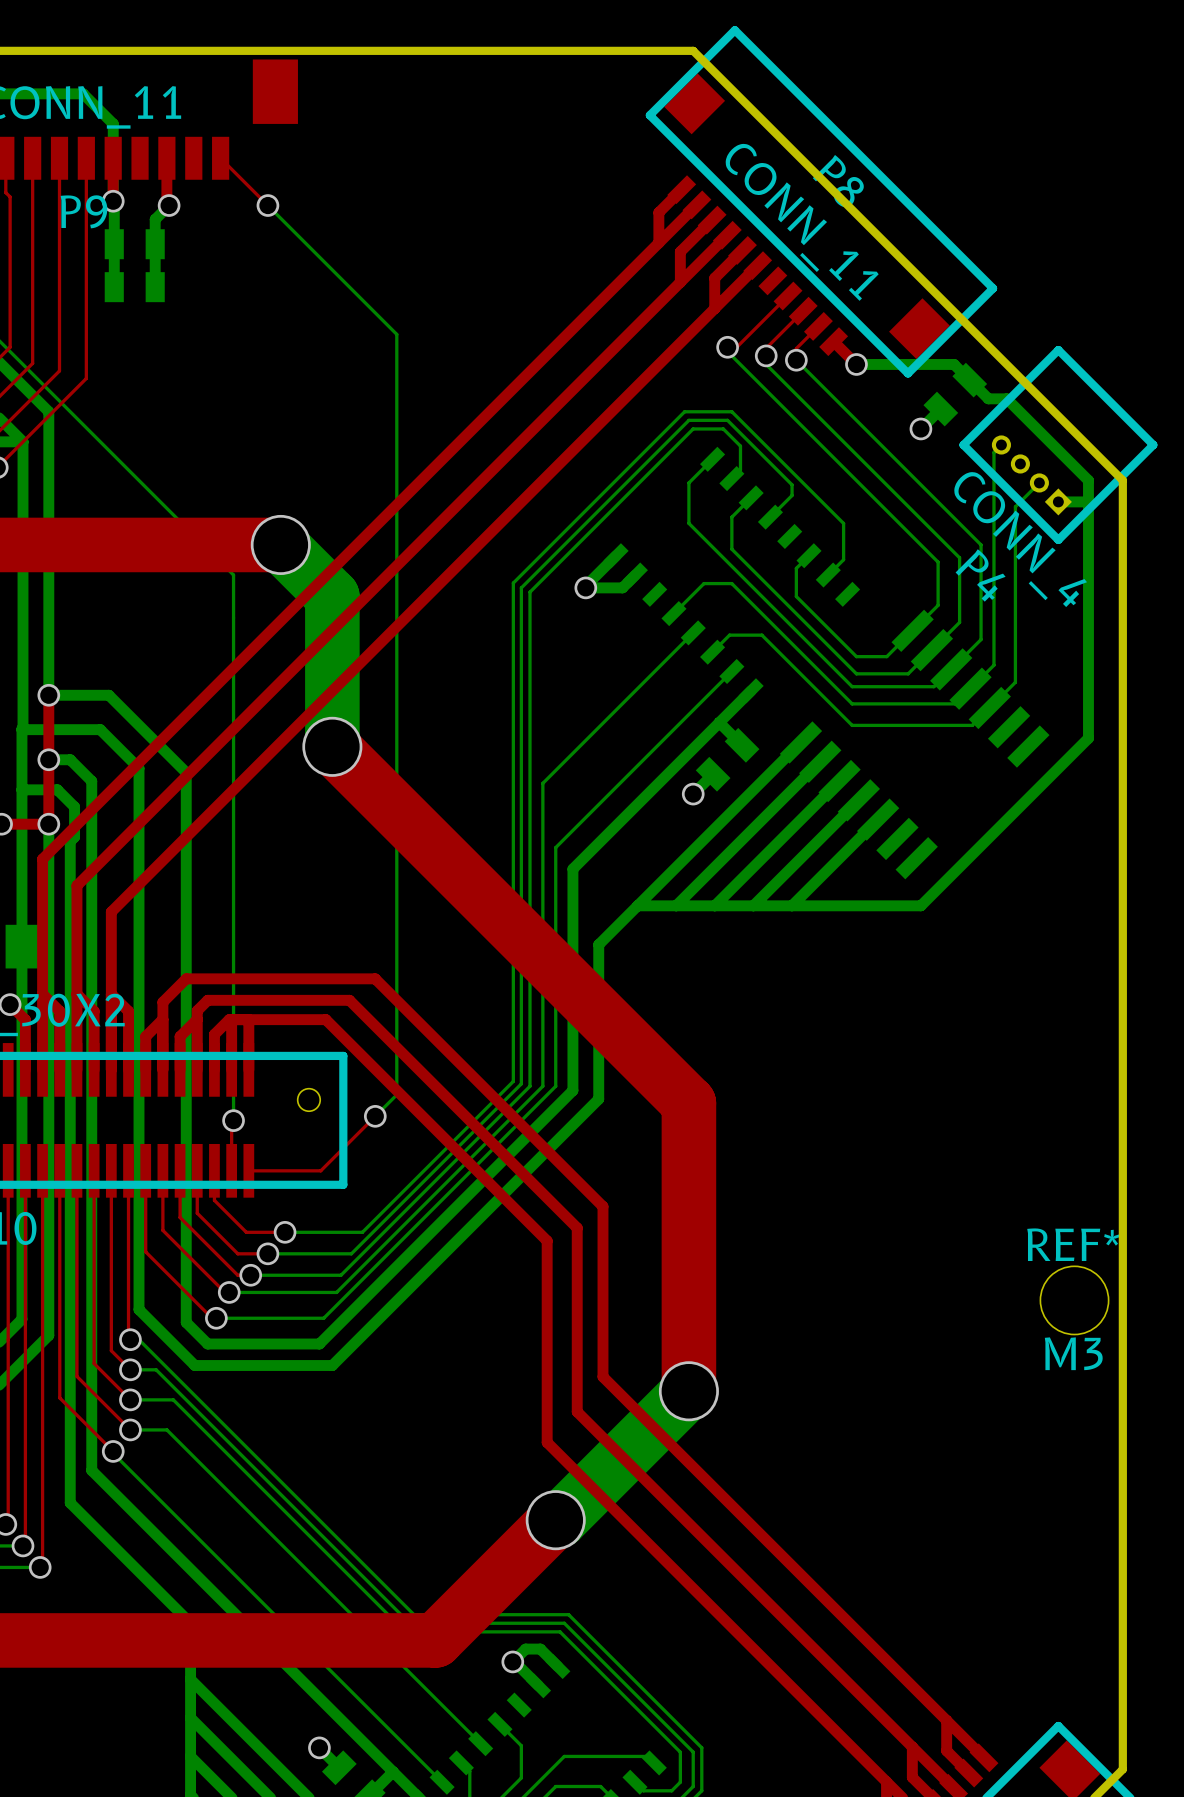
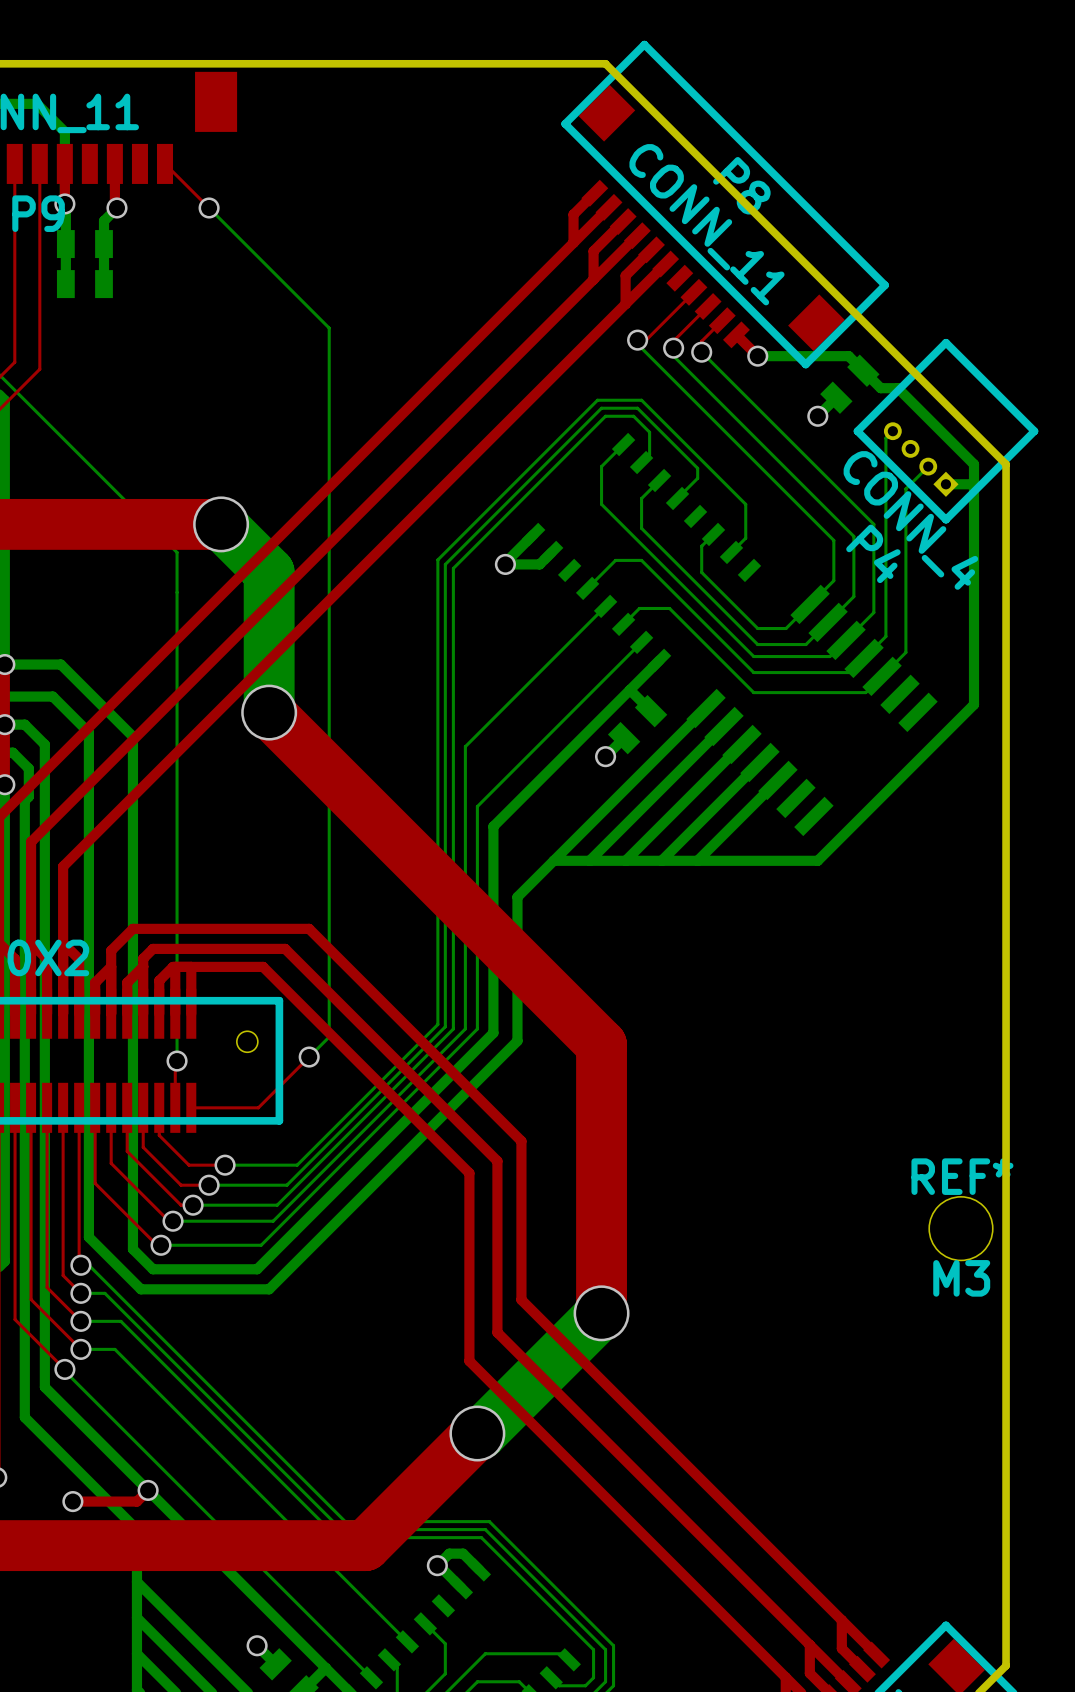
top track: none -> (148, 1490) (136, 1501) (72, 1501)
via: none -> (148, 1490)
via: none -> (72, 1501)

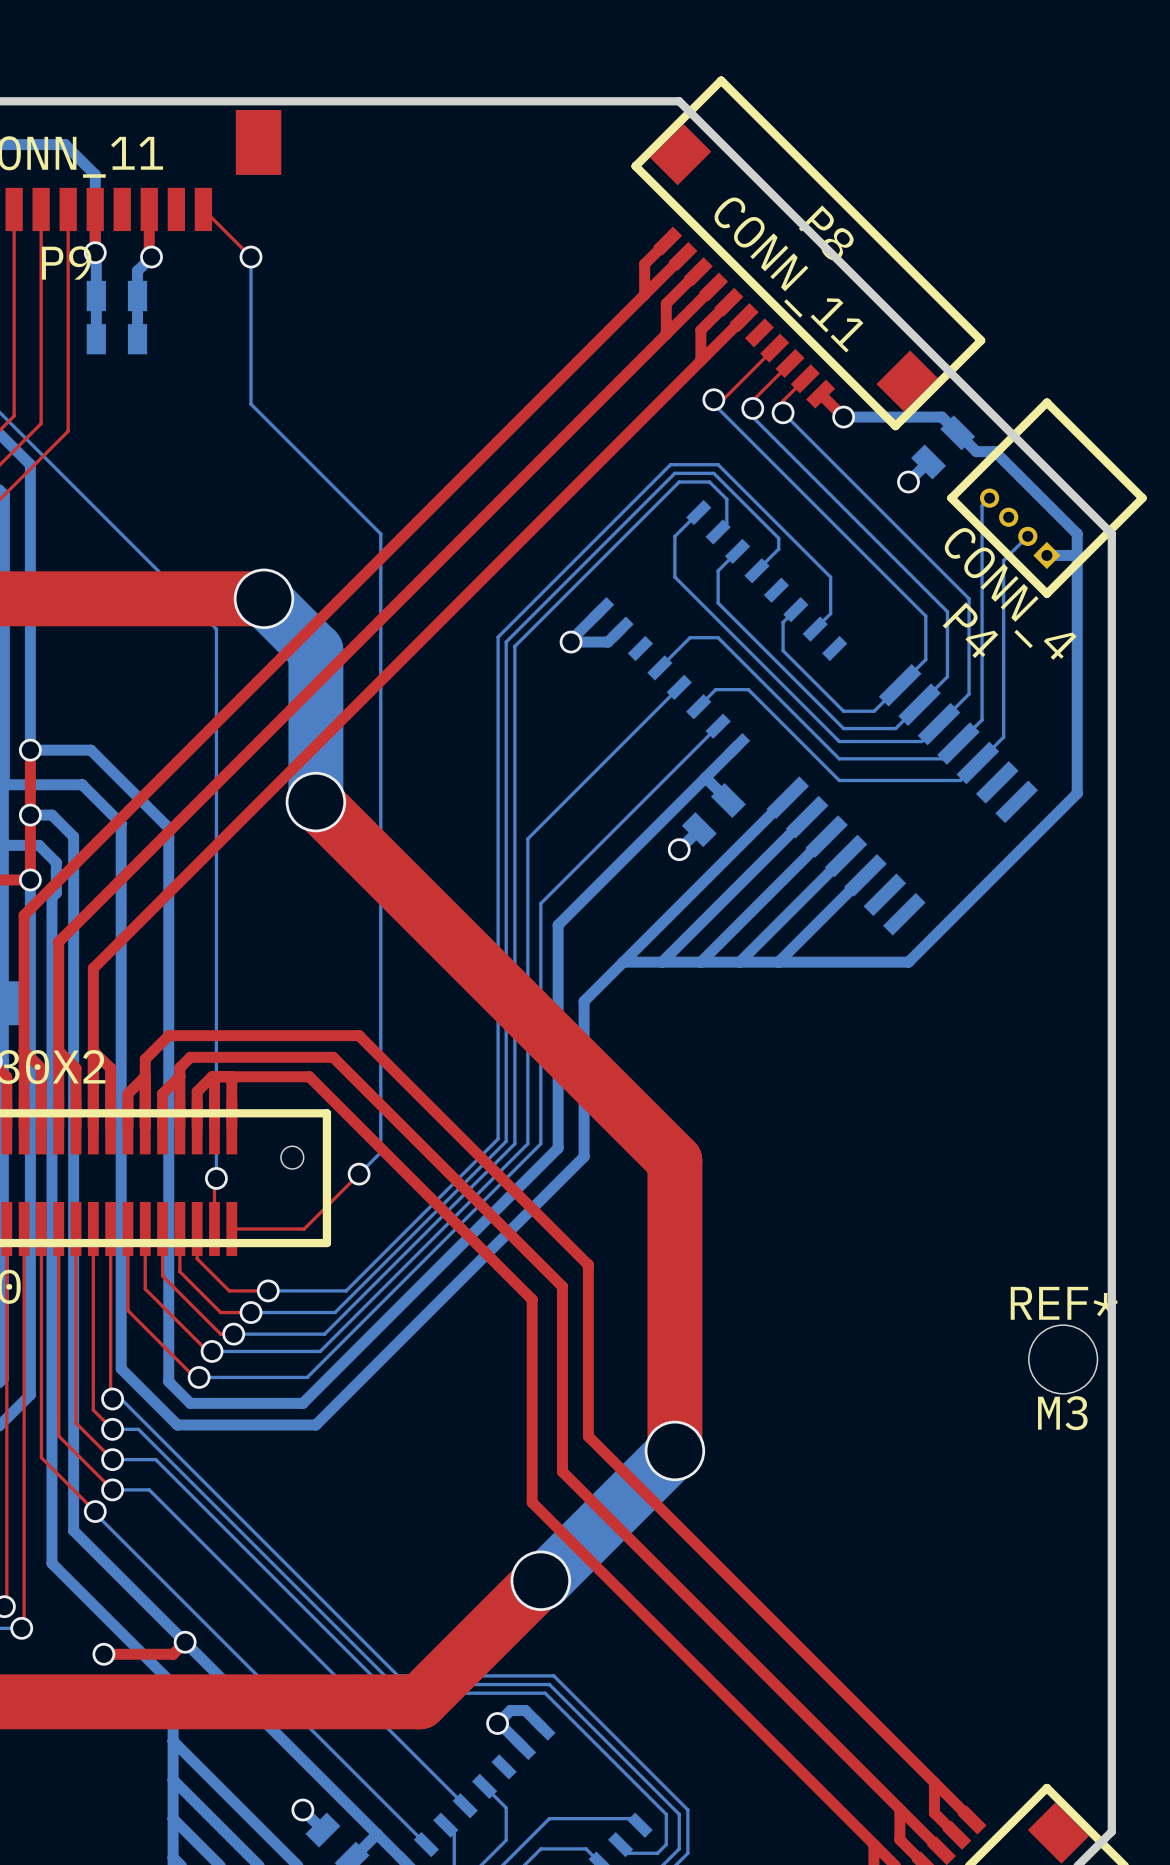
bottom track: (209, 207) (329, 328) (329, 464) -> (251, 257) (251, 404) (380, 533)

